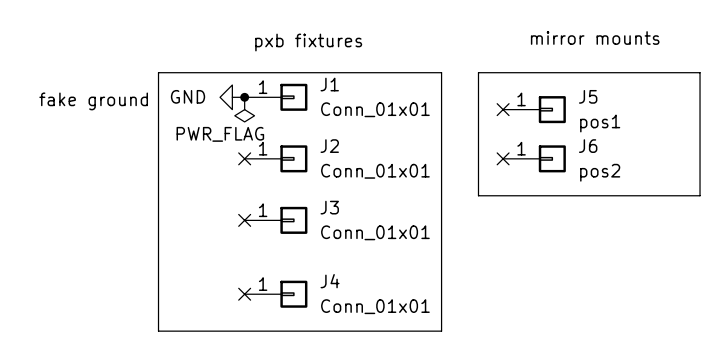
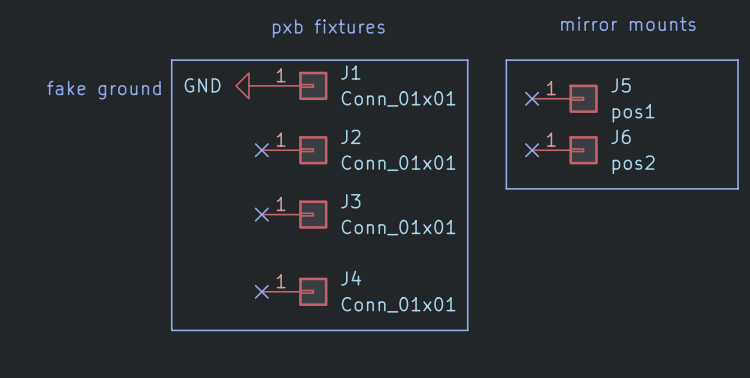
junction: (244, 97) -> none
power symbol: PWR_FLAG (244, 109) -> none

